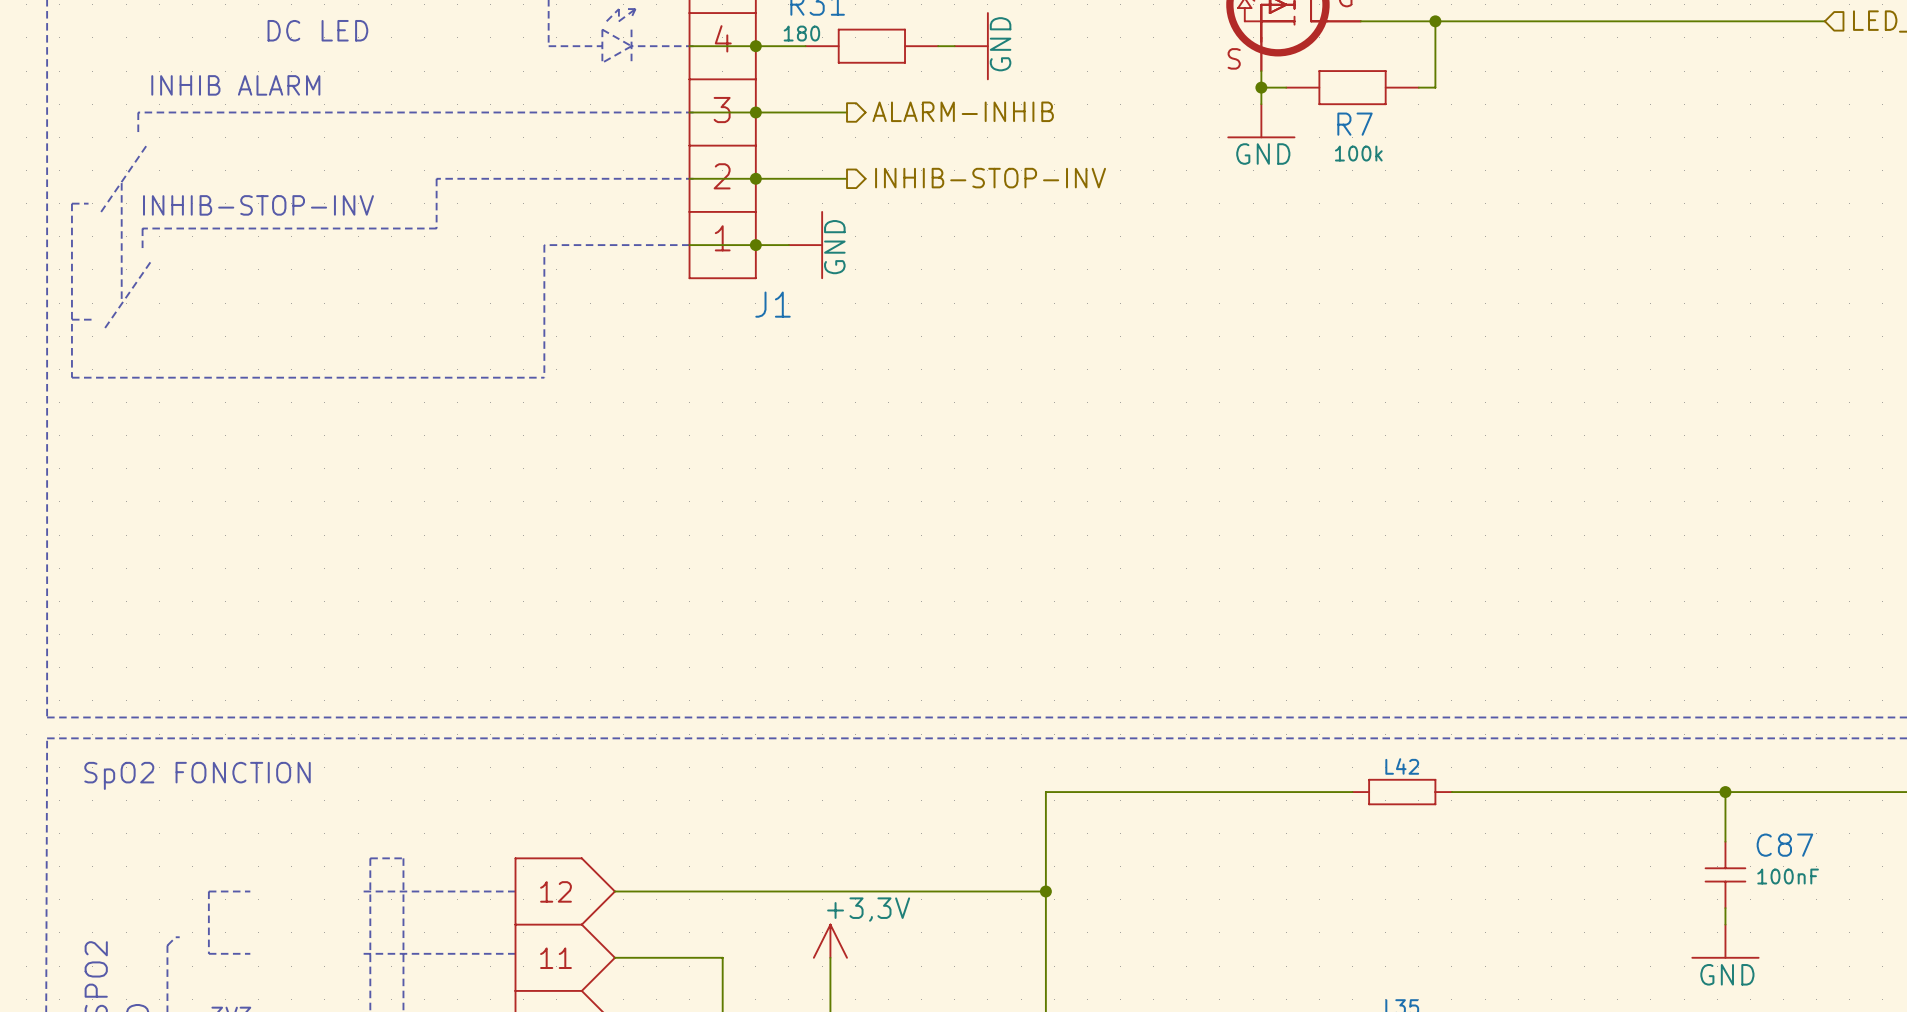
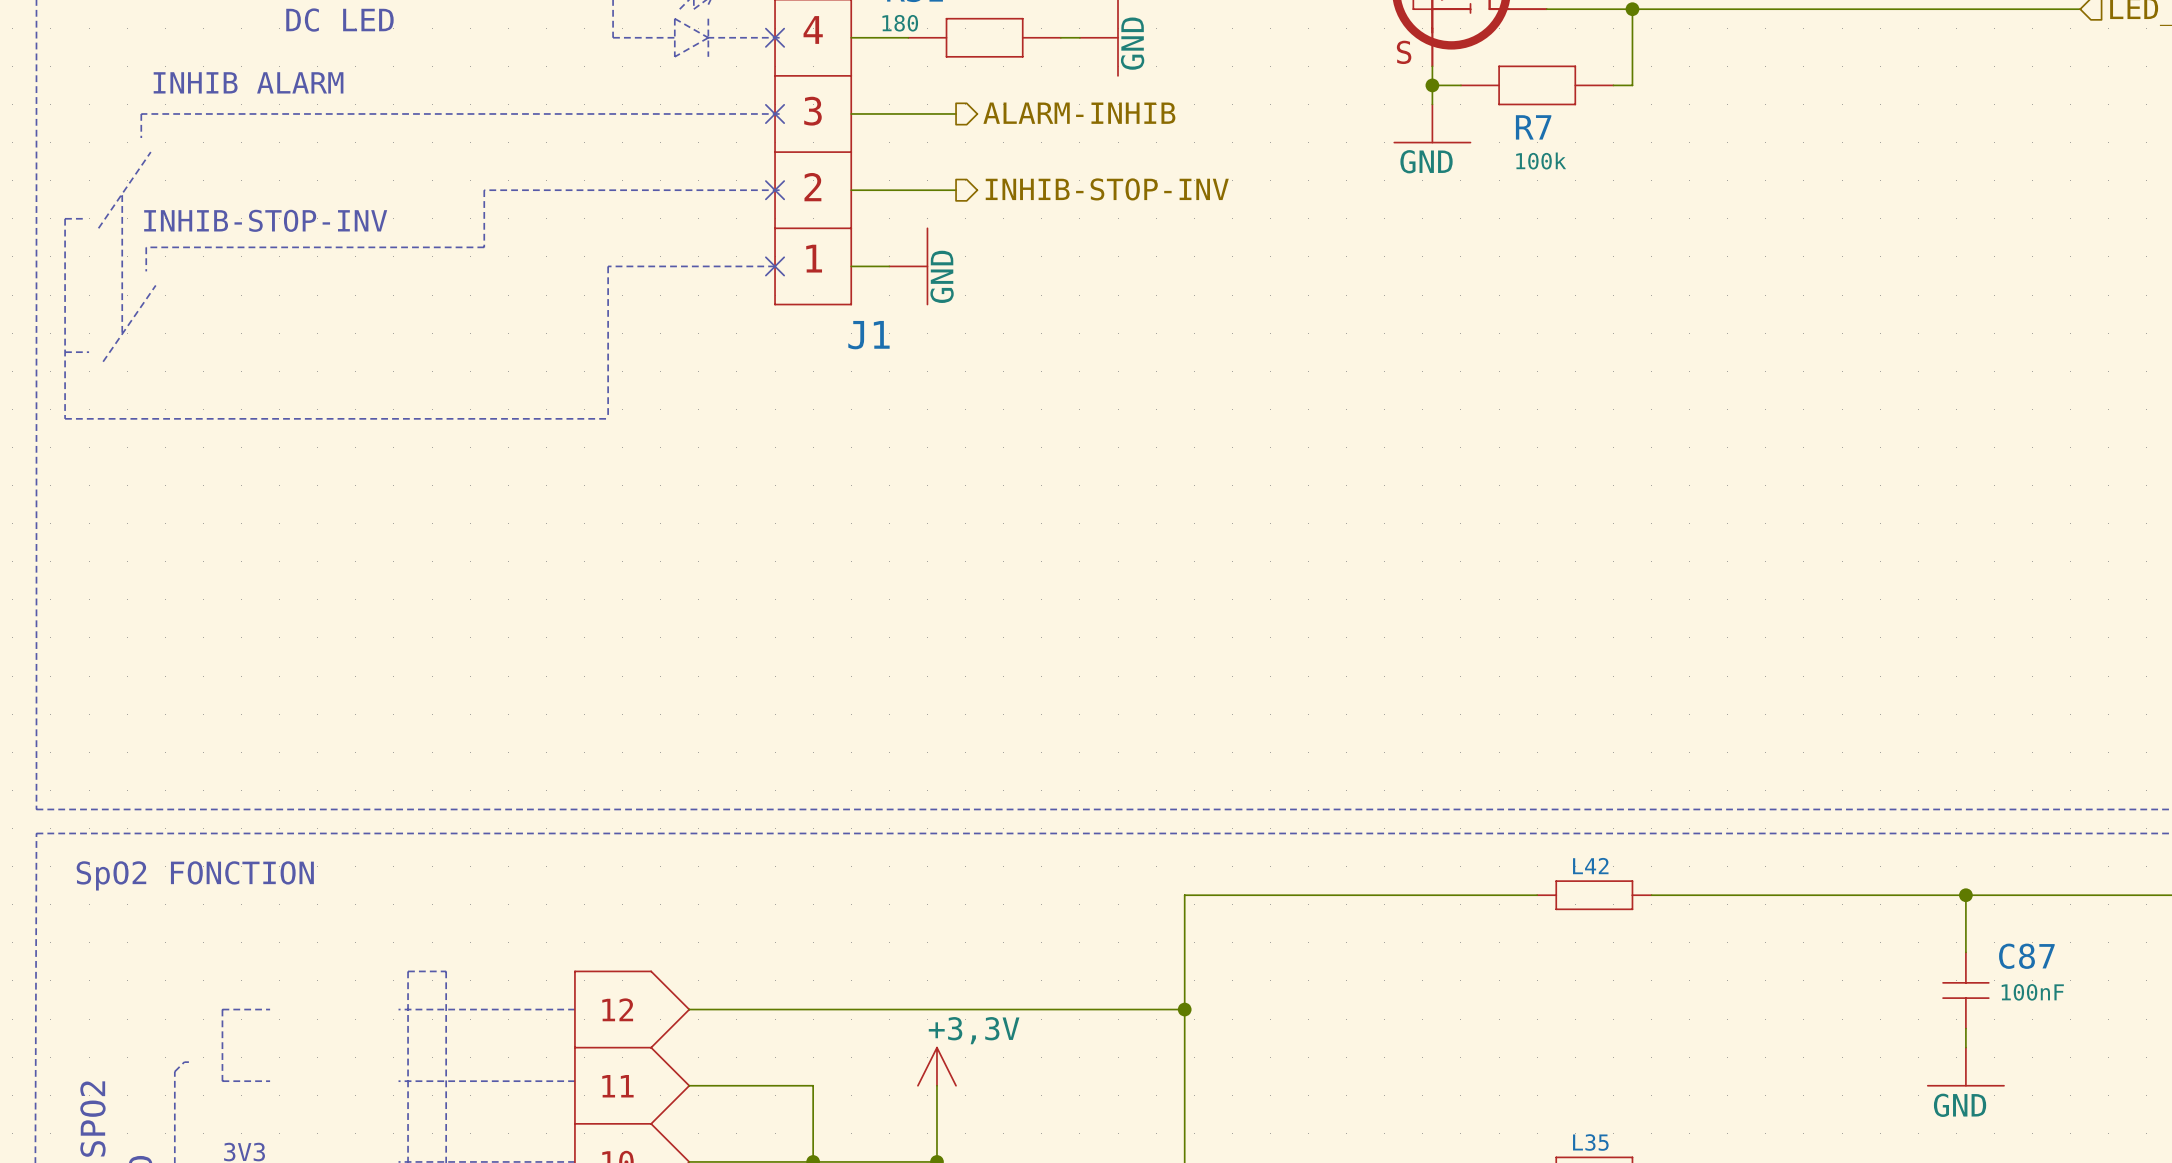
wire: (689, 46) (755, 46) -> none
no-connect mark: none -> (775, 37)
junction: (755, 46) -> none
wire: (689, 112) (755, 112) -> none
no-connect mark: none -> (775, 113)
junction: (755, 112) -> none
wire: (689, 178) (755, 178) -> none
no-connect mark: none -> (775, 190)
junction: (755, 178) -> none
wire: (689, 245) (755, 245) -> none
no-connect mark: none -> (775, 266)
junction: (755, 245) -> none

